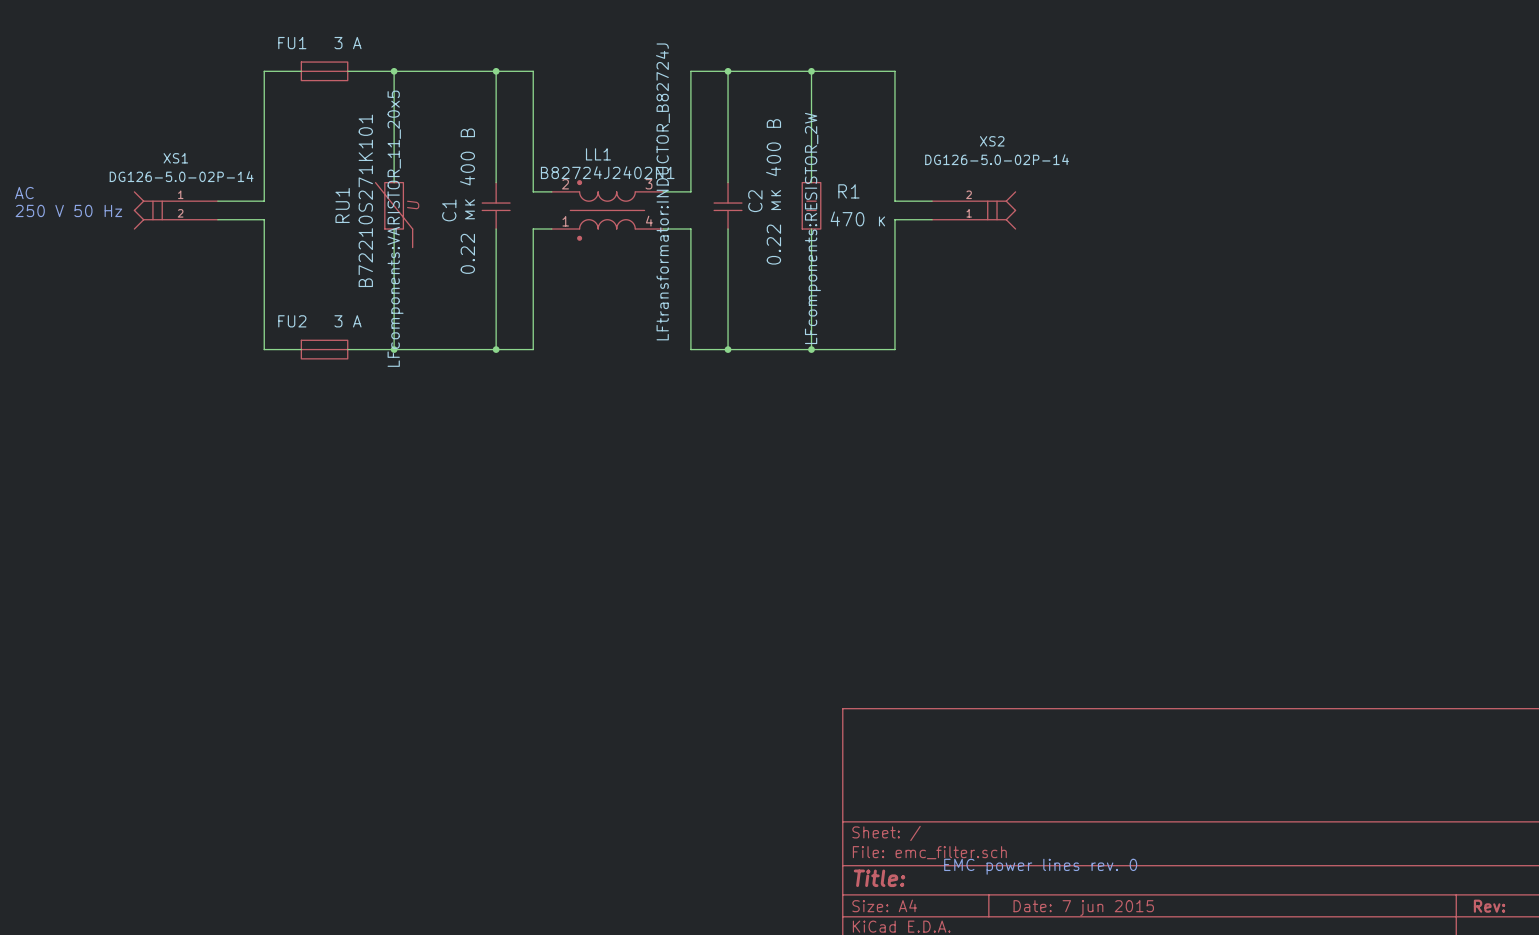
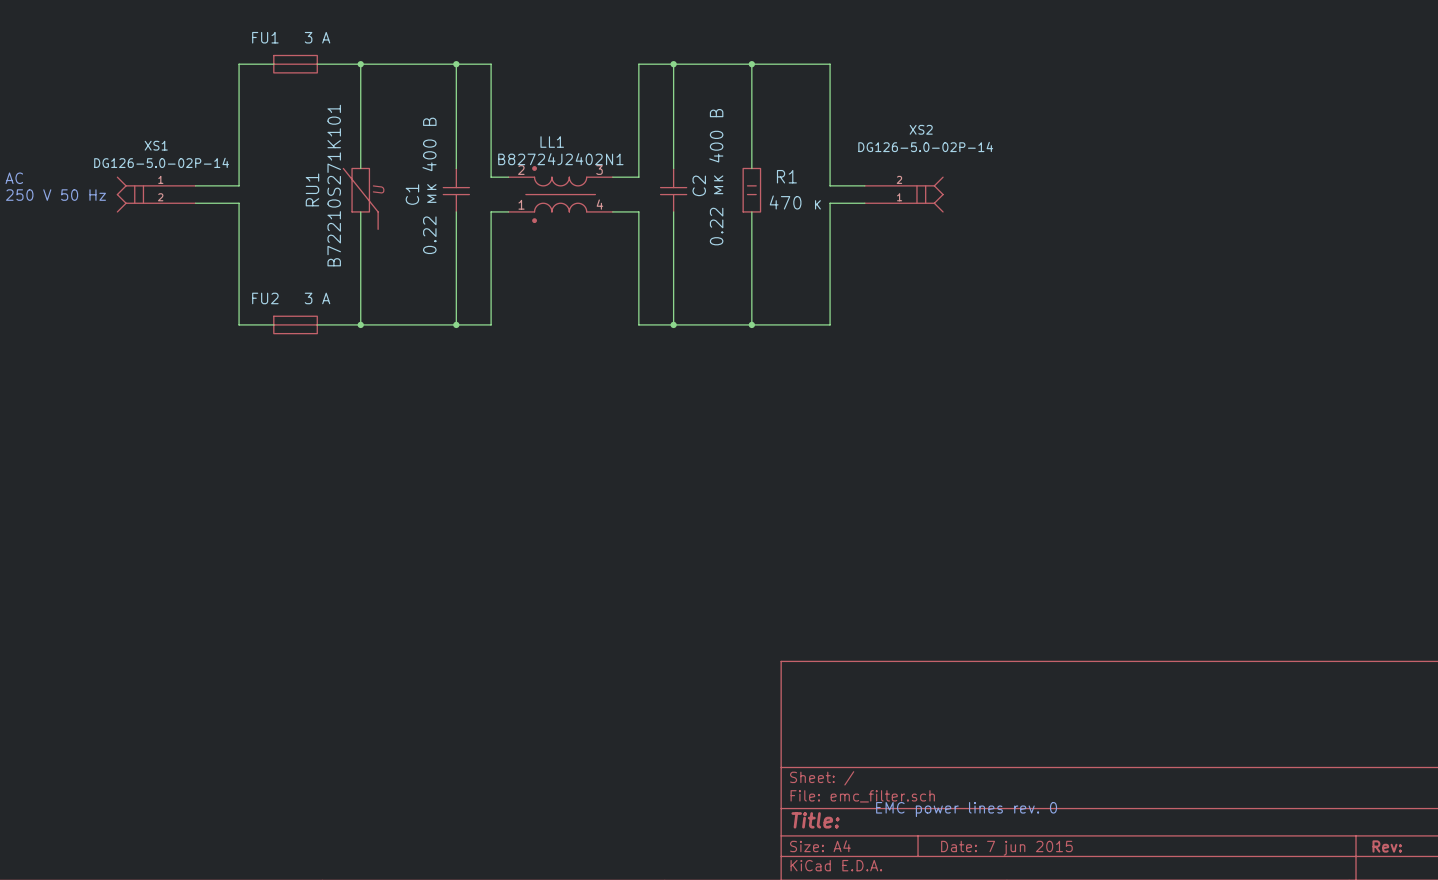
LL1 text: LFtransformator:INDUCTOR_B82724J (662, 191) -> none
RU1 text: LFcomponents:VARISTOR_11_20x5 (395, 228) -> none
R1 text: LFcomponents:RESISTOR_2W (812, 228) -> none

